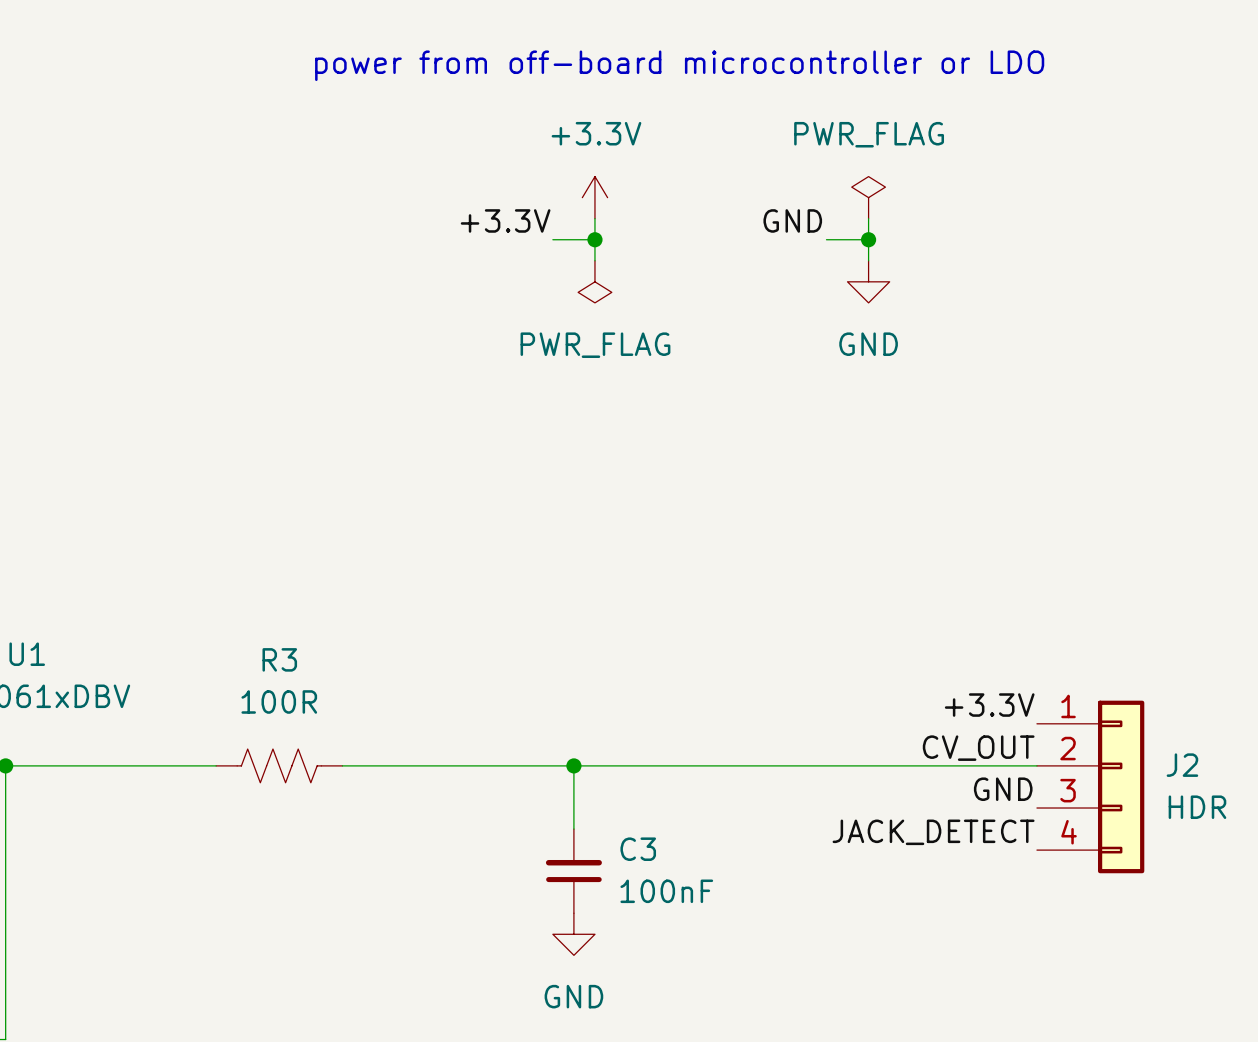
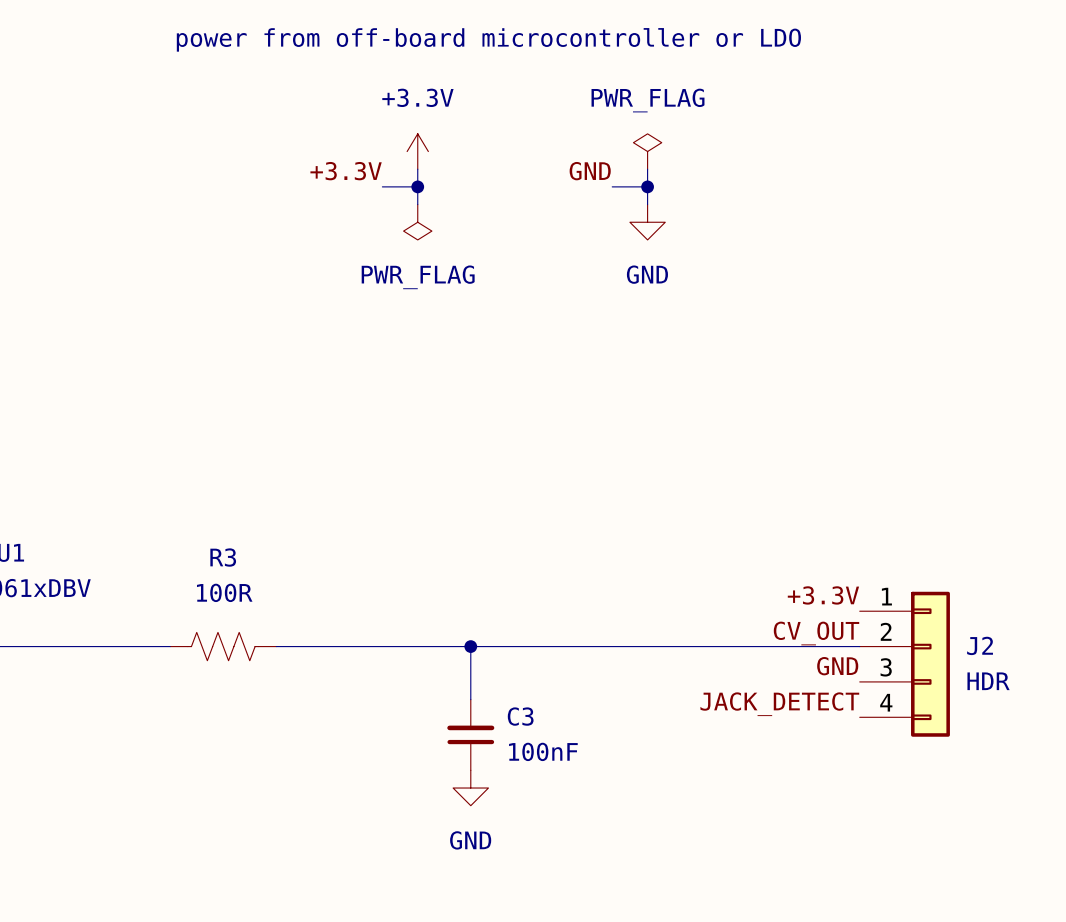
text position: power from off-board microcontroller or LDO (679, 65) -> power from off-board microcontroller or LDO (488, 39)
power symbol position: +3.3V (594, 197) -> +3.3V (417, 151)
power symbol position: PWR_FLAG (868, 197) -> PWR_FLAG (647, 151)
wire: (594, 218) (594, 260) -> (417, 169) (417, 204)
wire: (868, 218) (868, 260) -> (647, 169) (647, 204)
label position: +3.3V (505, 220) -> +3.3V (346, 171)
label position: GND (792, 220) -> GND (590, 171)
wire: (552, 239) (594, 239) -> (382, 186) (417, 186)
junction position: (594, 239) -> (417, 186)
wire: (826, 239) (868, 239) -> (612, 186) (647, 186)
junction position: (868, 239) -> (647, 186)
power symbol position: PWR_FLAG (594, 281) -> PWR_FLAG (417, 222)
power symbol position: GND (868, 281) -> GND (647, 222)

